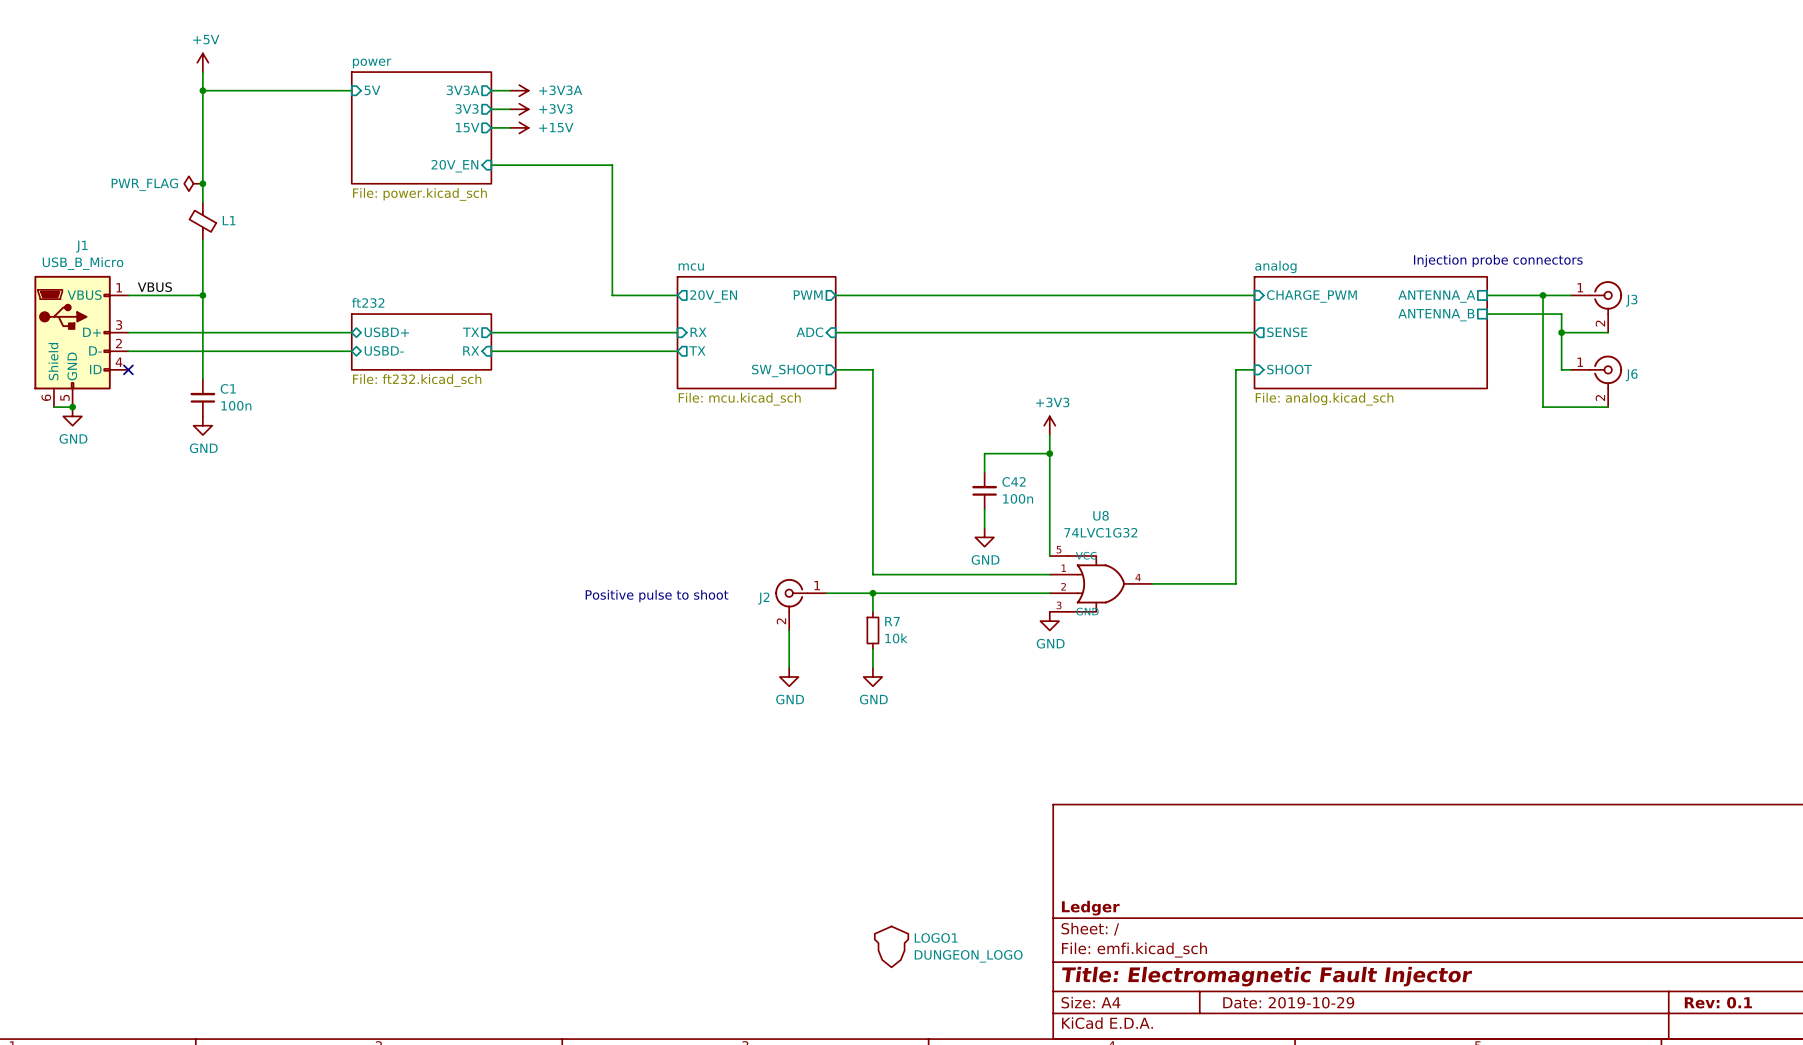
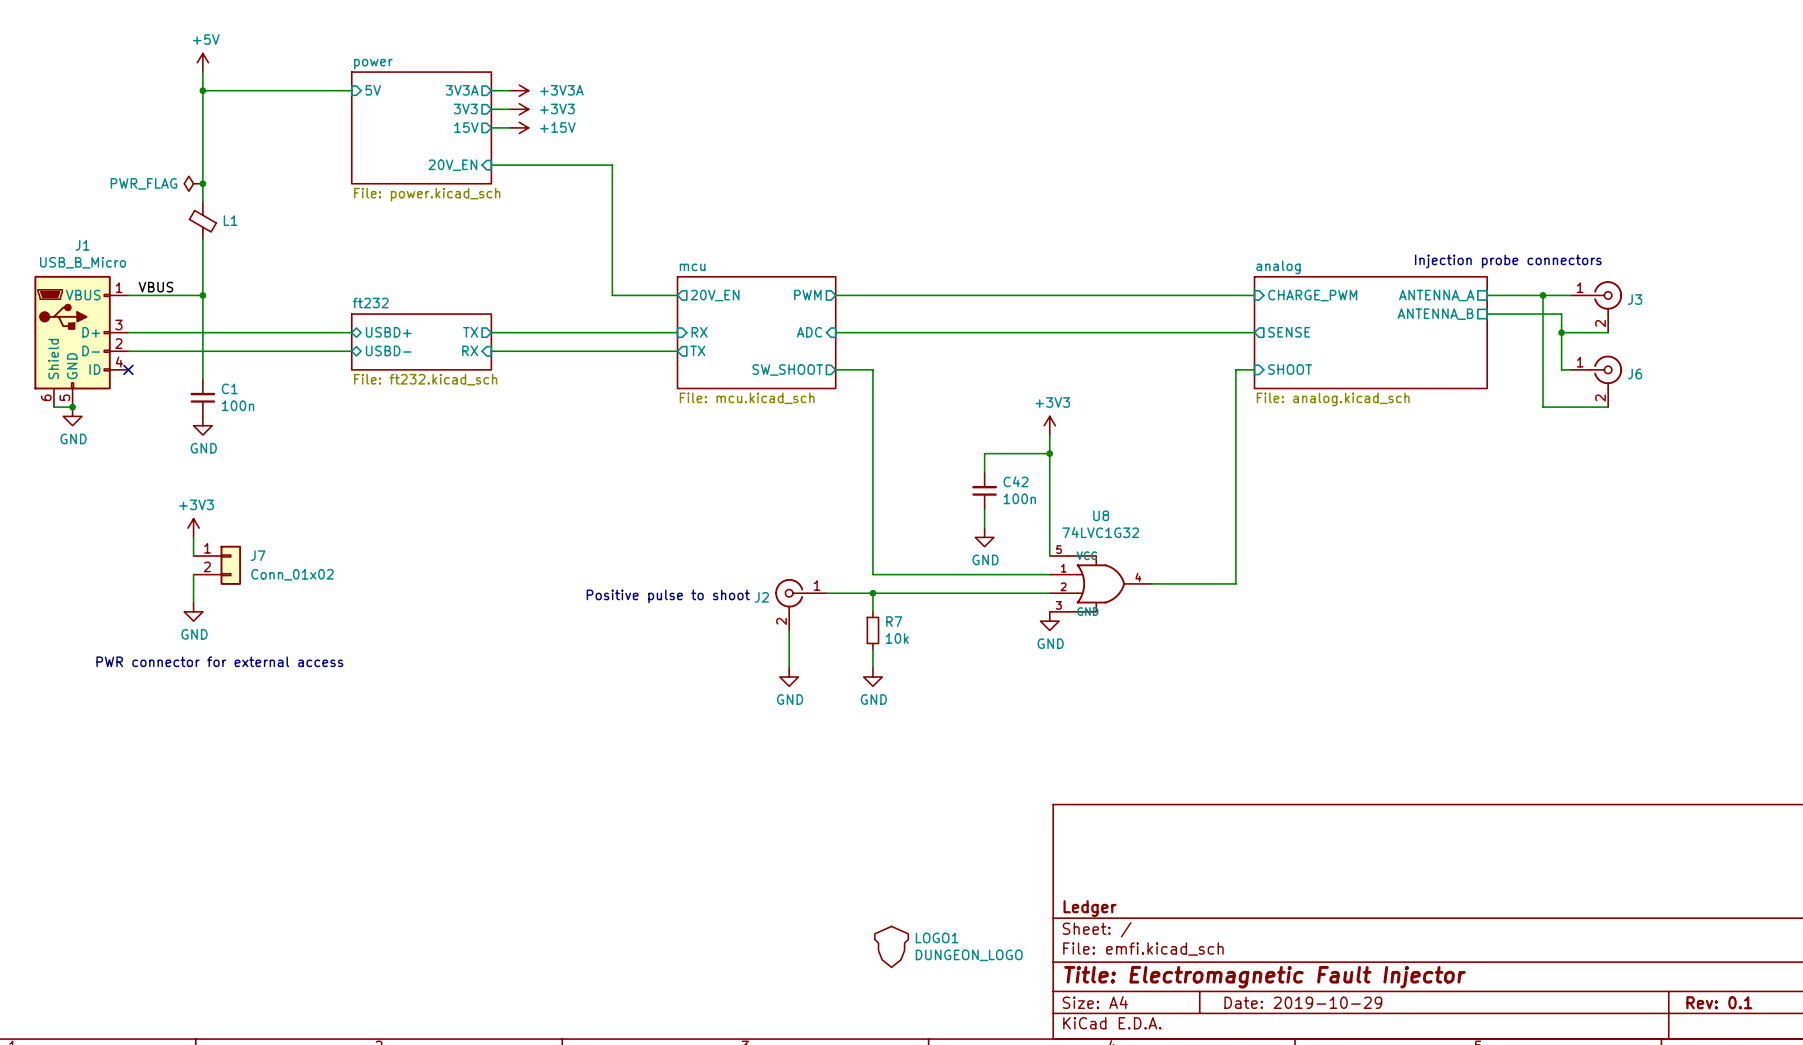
power symbol: none -> +3V3 (193, 528)
wire: none -> (193, 537) (193, 556)
J7: none -> Conn_01x02 (217, 565)
wire: none -> (193, 574) (193, 602)
power symbol: none -> GND (193, 611)
text: none -> PWR connector for external access (219, 661)

